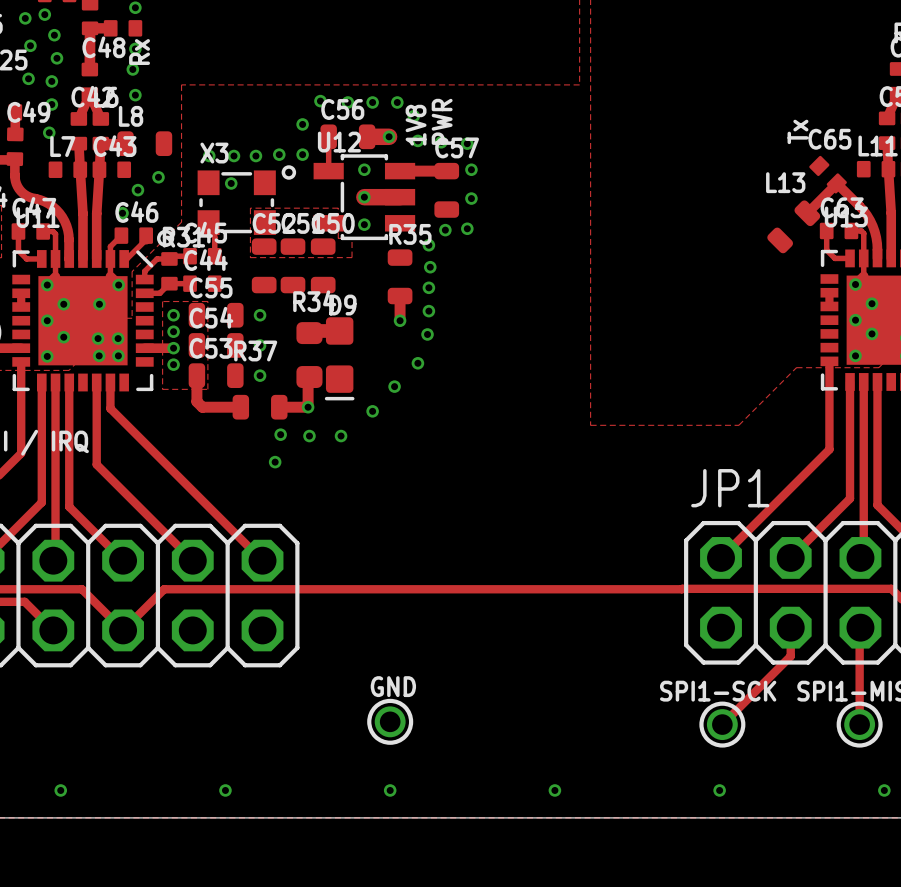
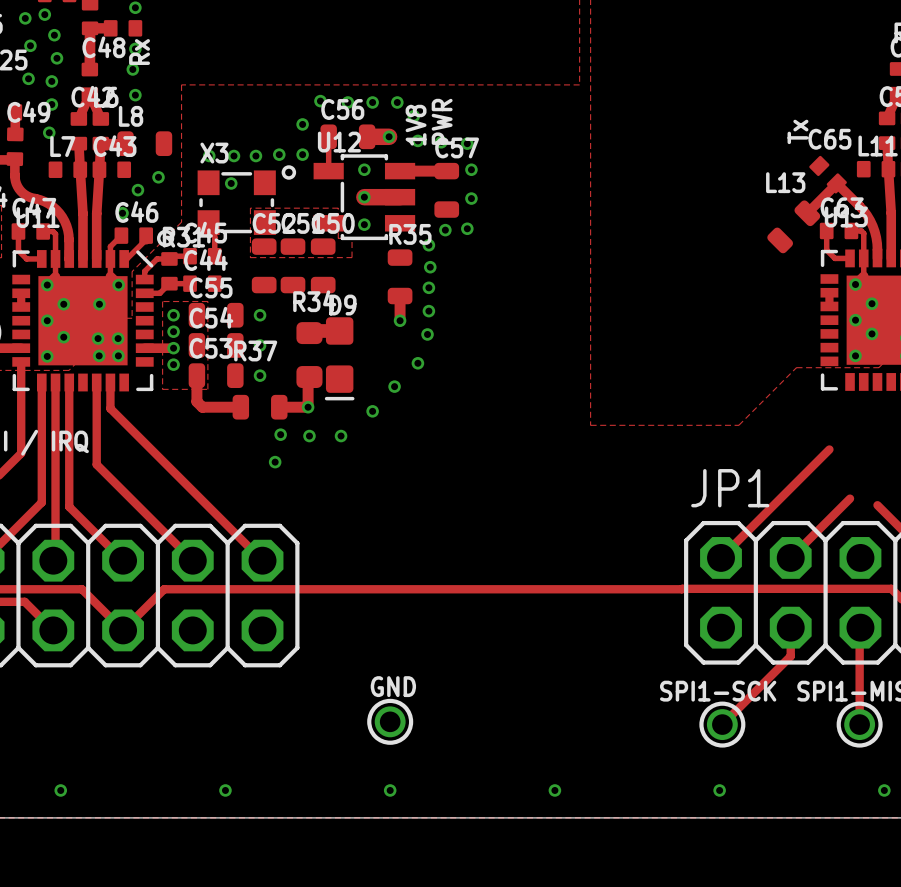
track: (829, 361) (829, 449) -> none
track: (850, 381) (850, 498) -> none
track: (863, 381) (863, 554) -> none
track: (877, 381) (877, 505) -> none

